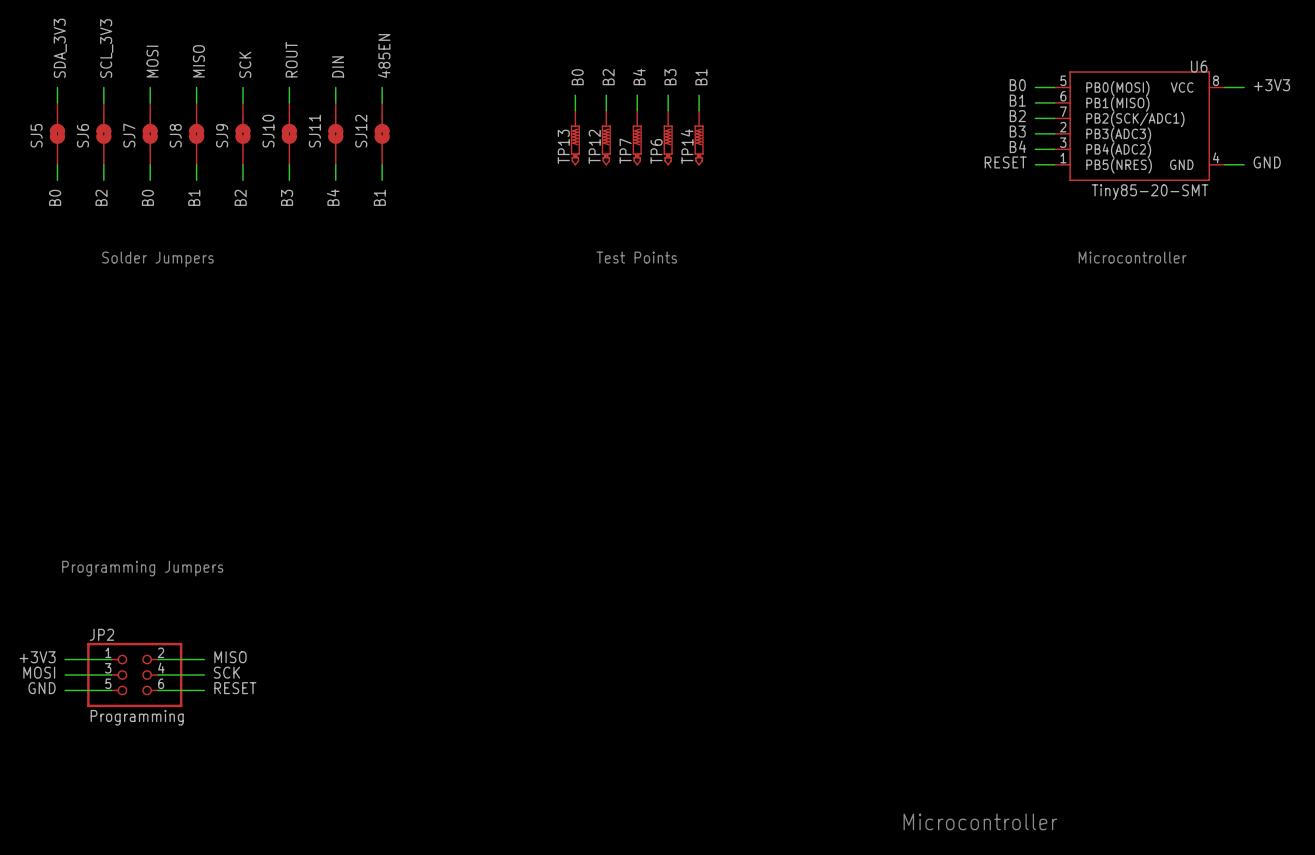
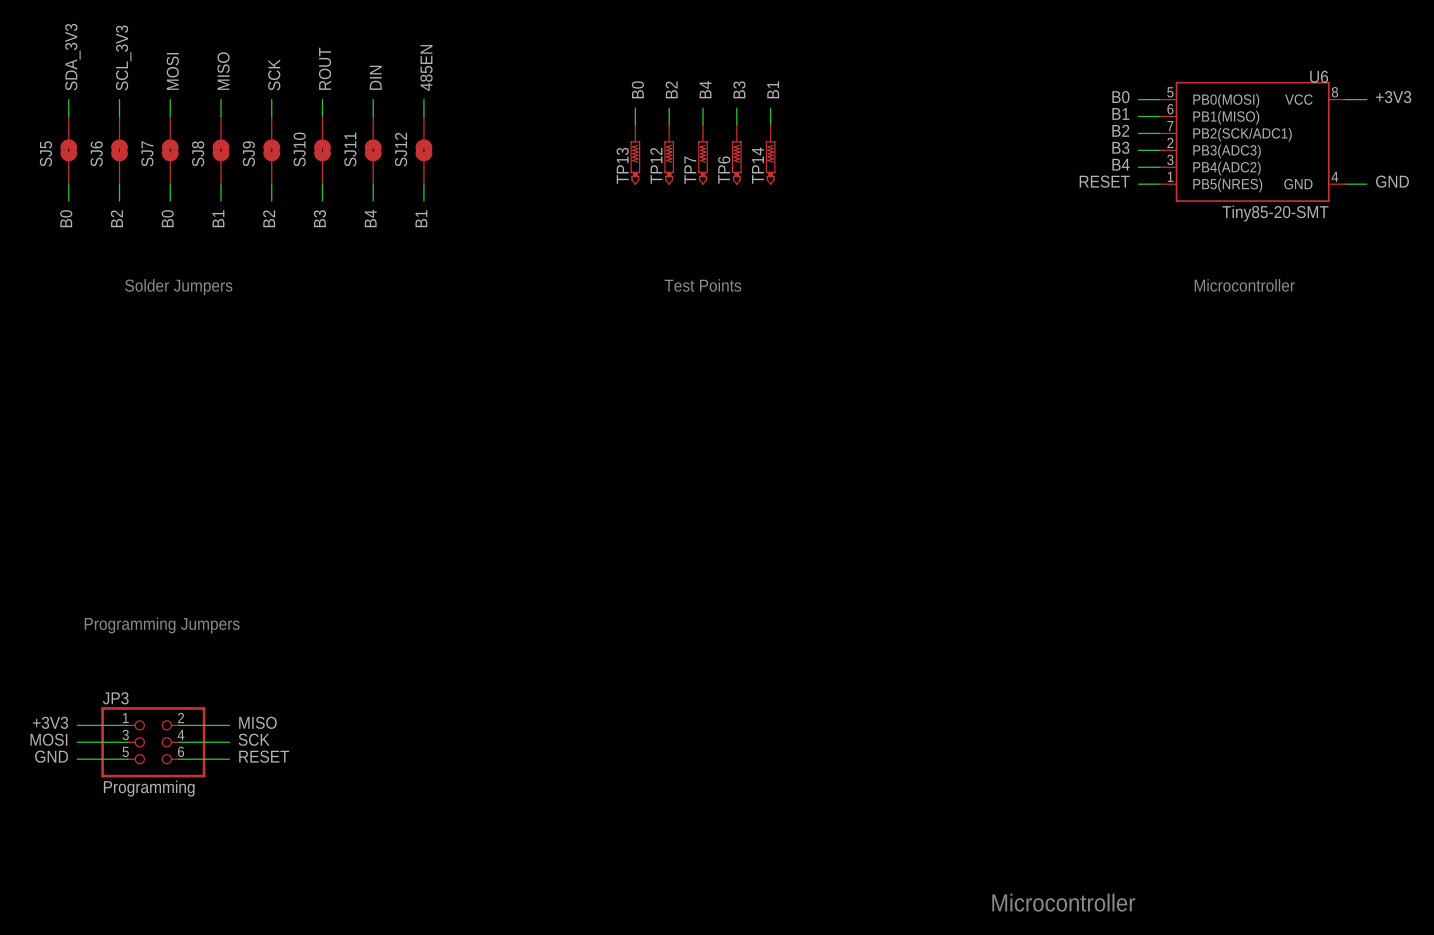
JP2 name: JP2 (101, 634) -> JP3 (115, 698)

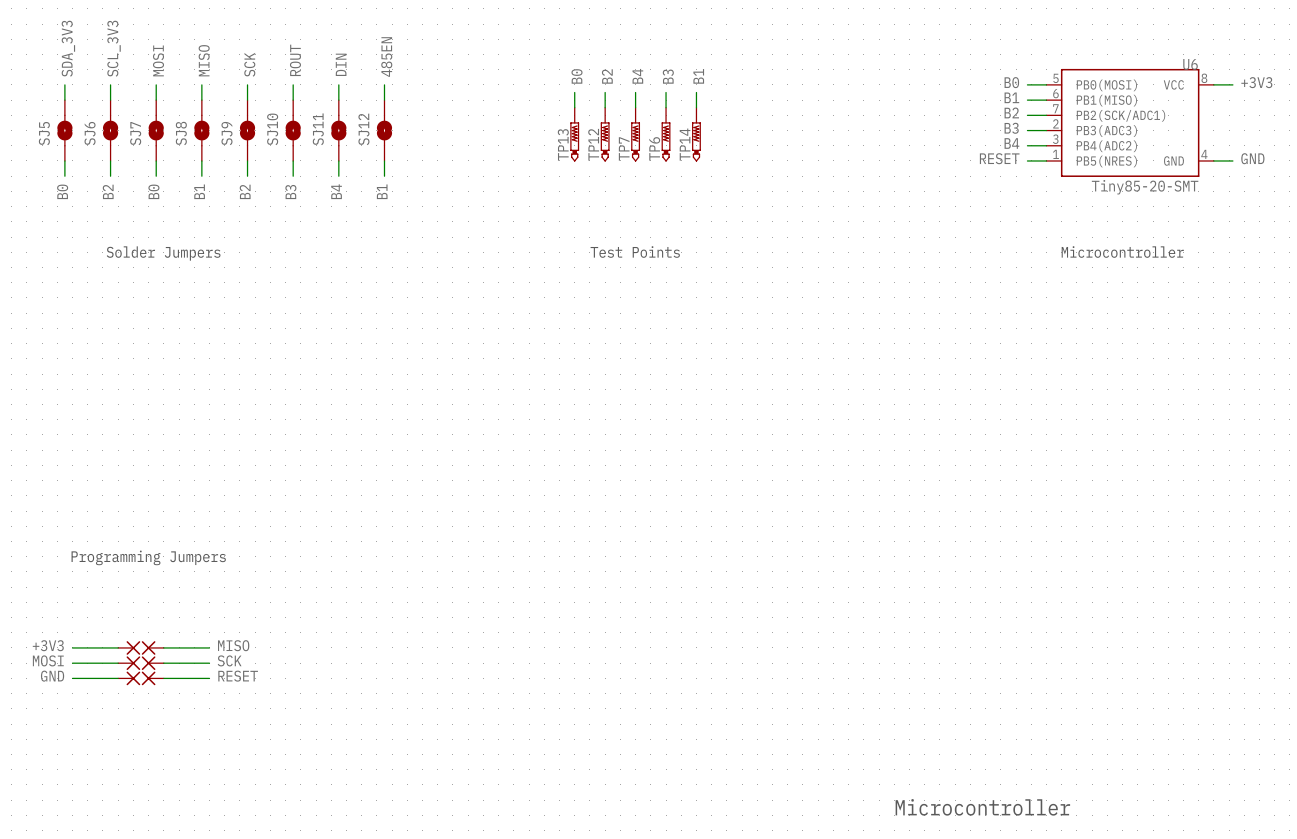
part: none -> (129, 647)
part: none -> (152, 647)
part: none -> (129, 663)
JP3: Programming (153, 742) -> none
part: none -> (152, 663)
part: none -> (129, 678)
part: none -> (152, 678)

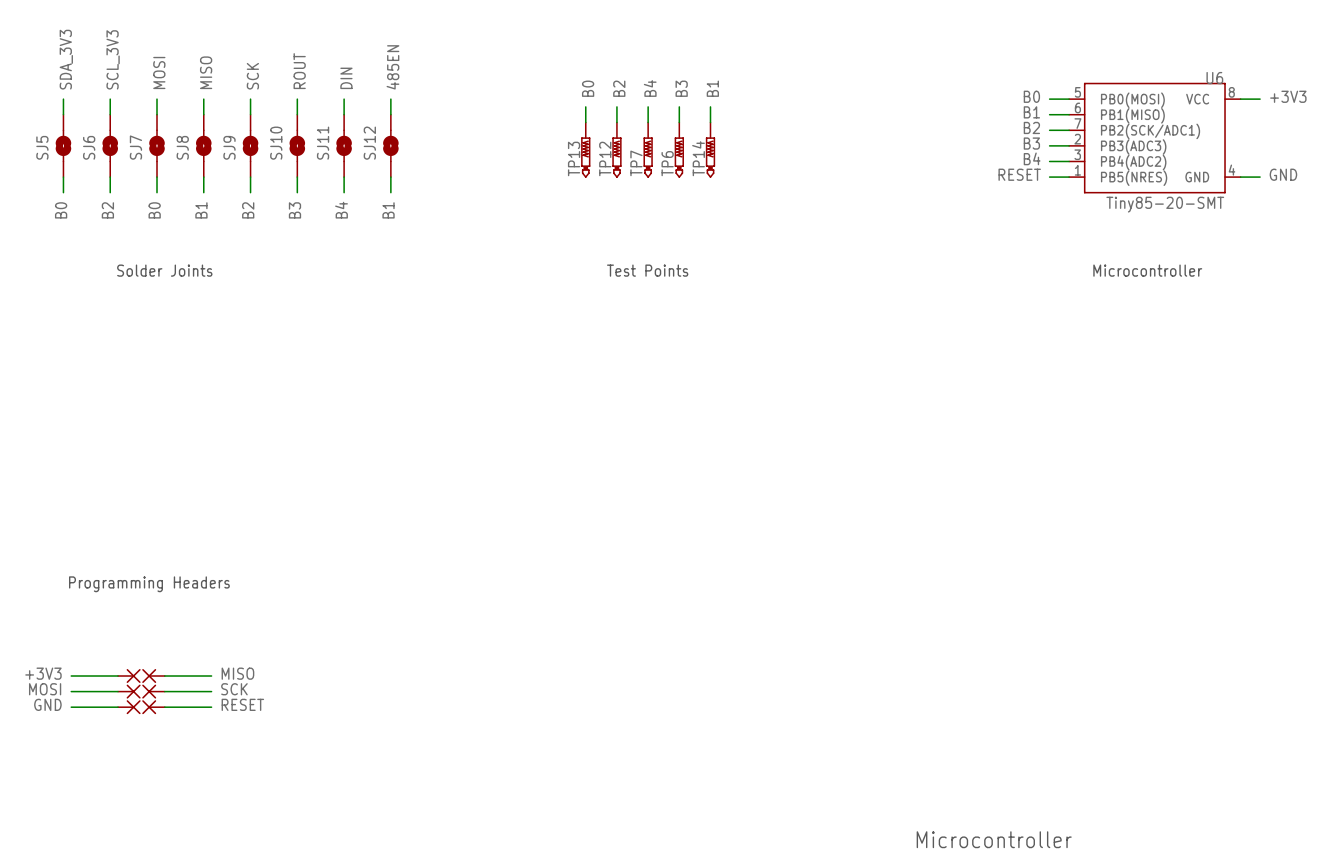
text: Solder Jumpers (163, 253) -> Solder Joints (164, 270)
text: Programming Jumpers (148, 557) -> Programming Headers (149, 584)

